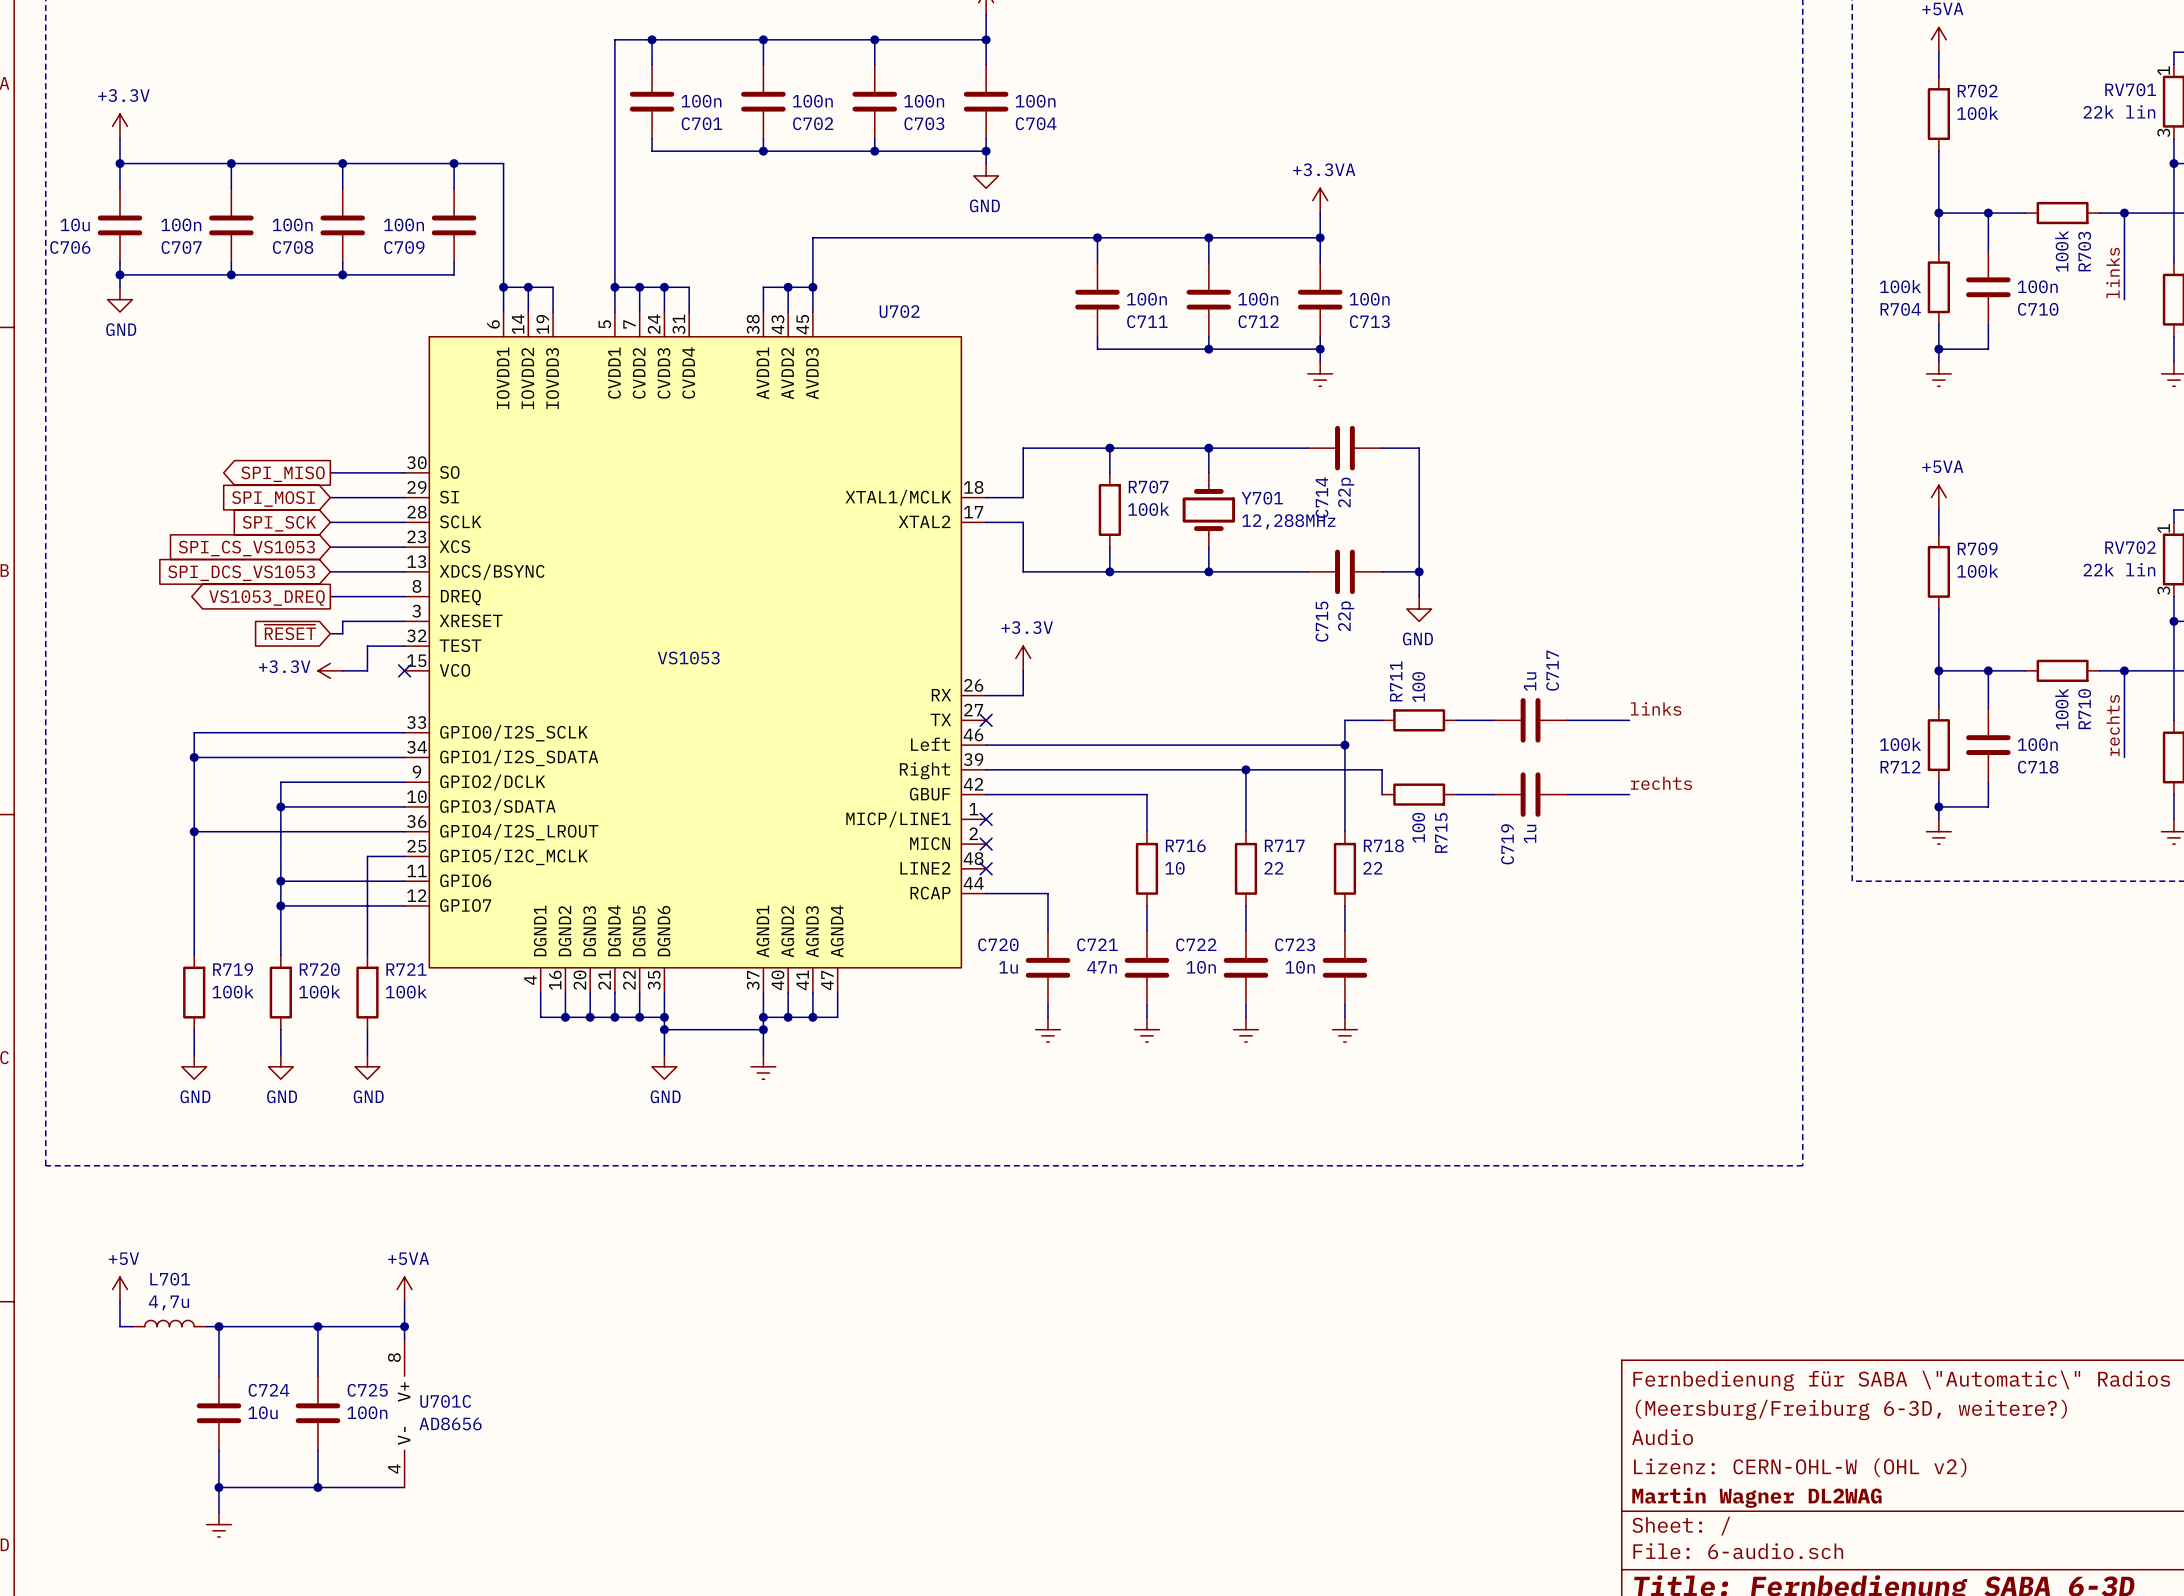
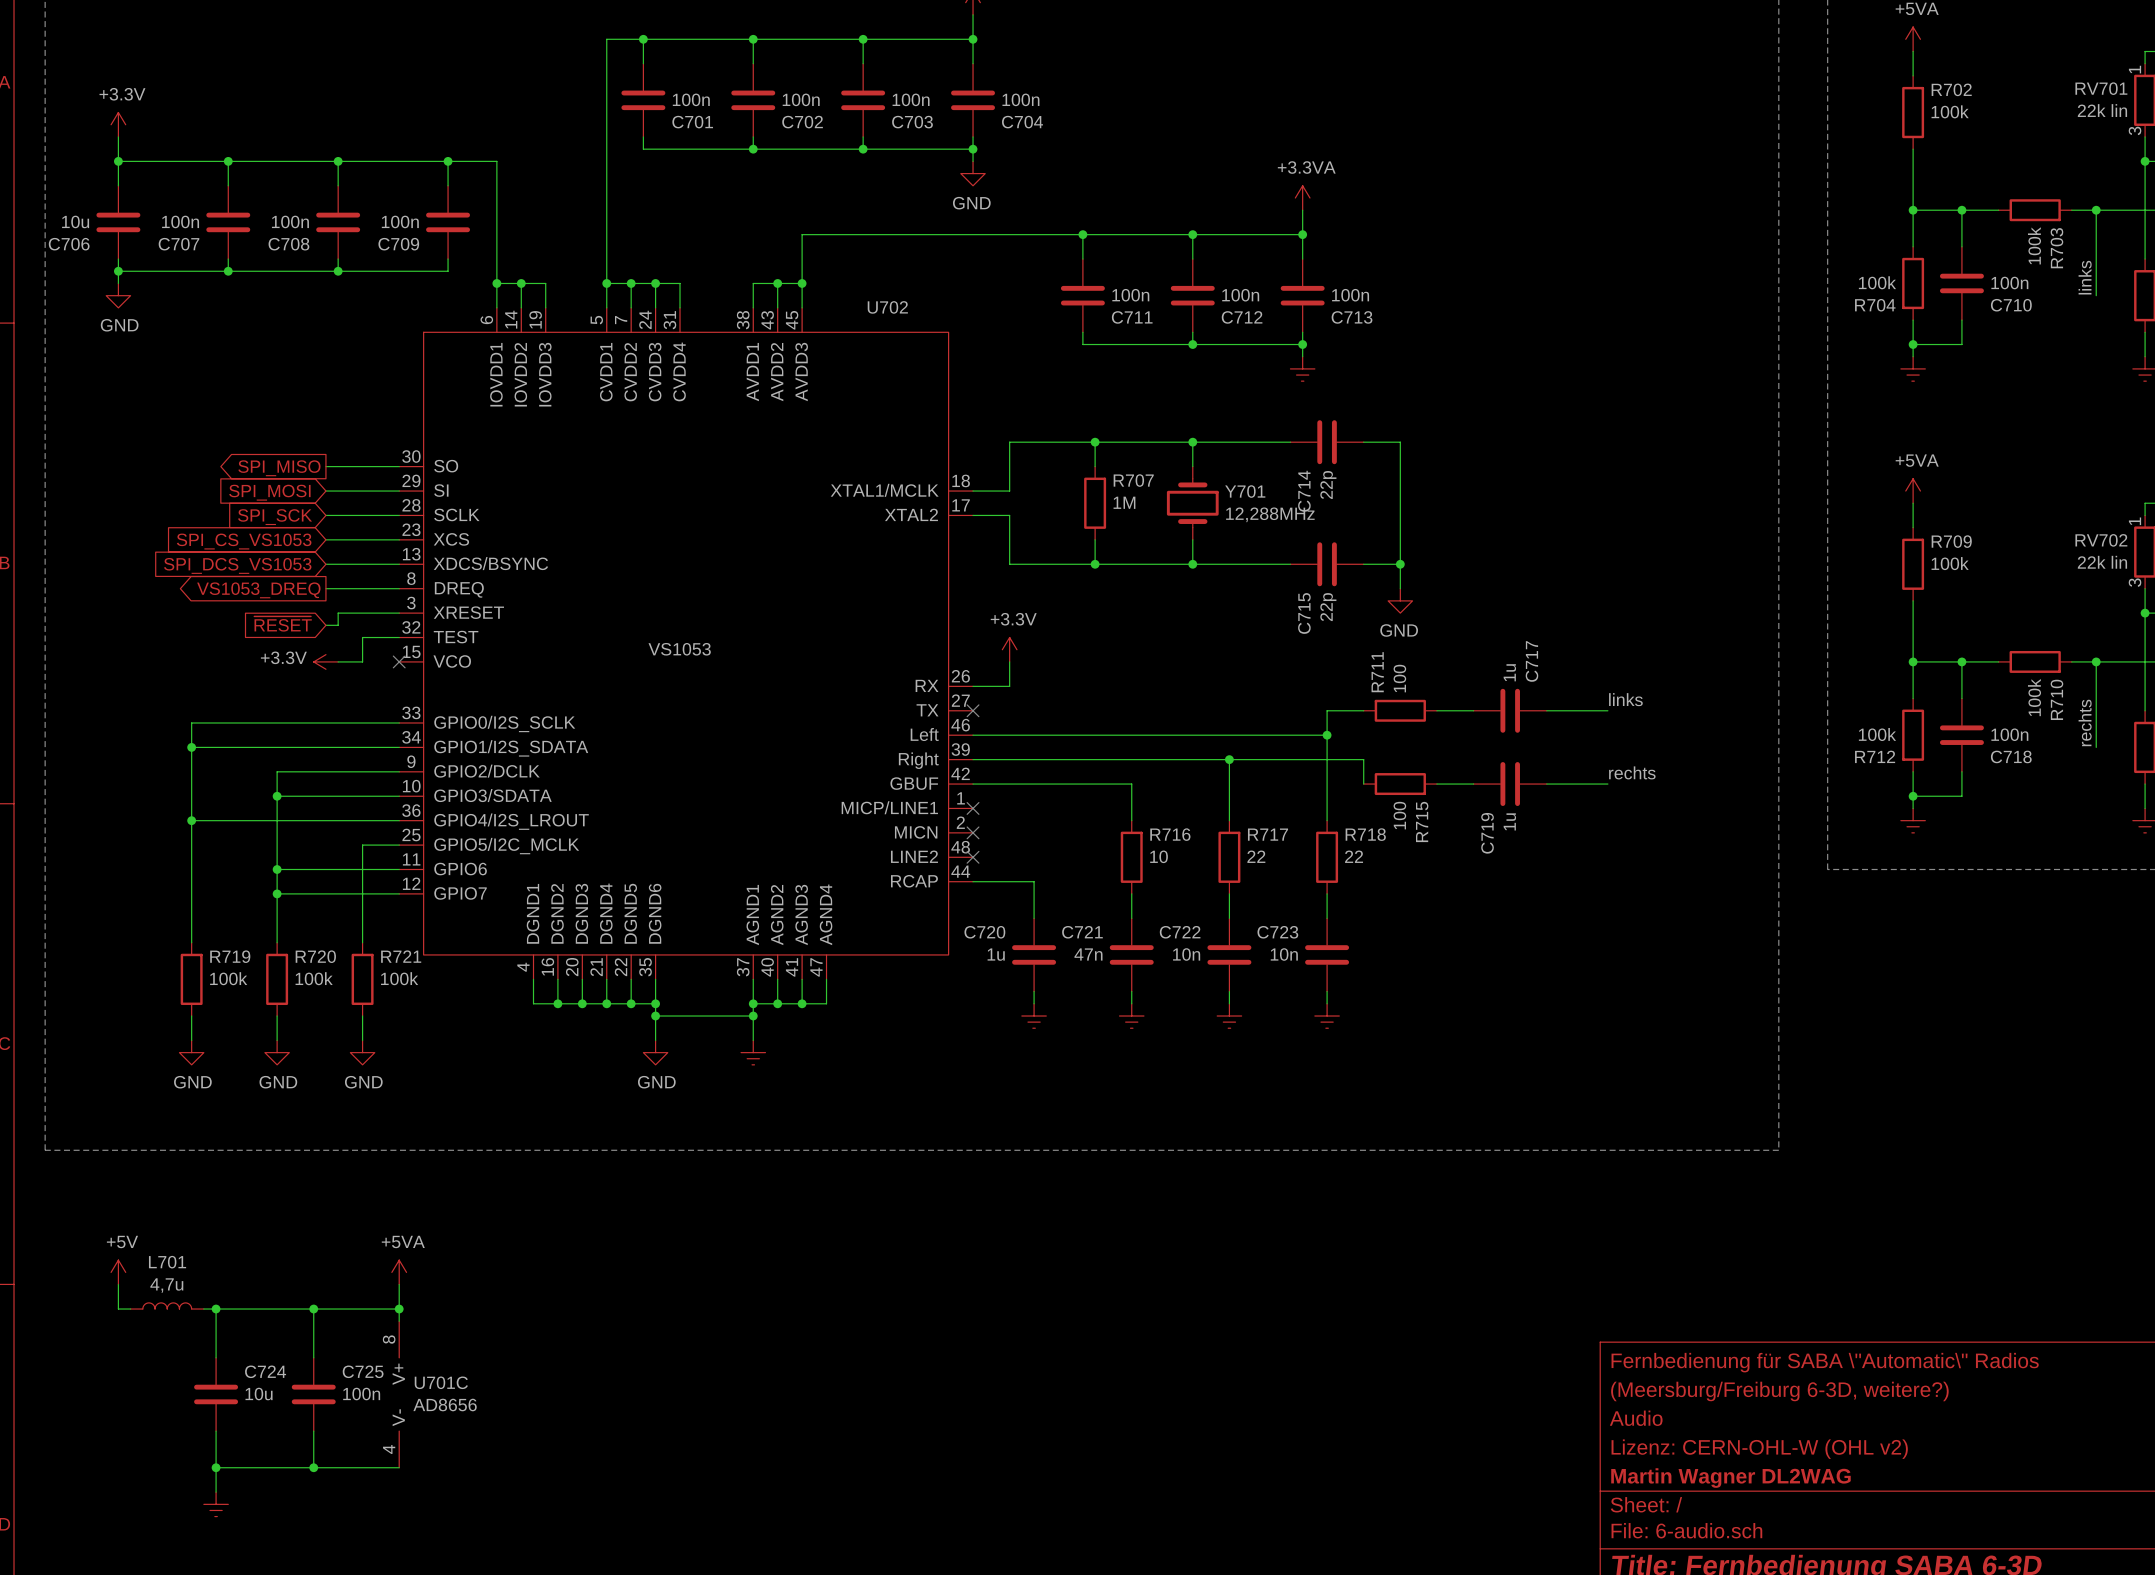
R707 value: 100k (1148, 509) -> 1M (1124, 502)

